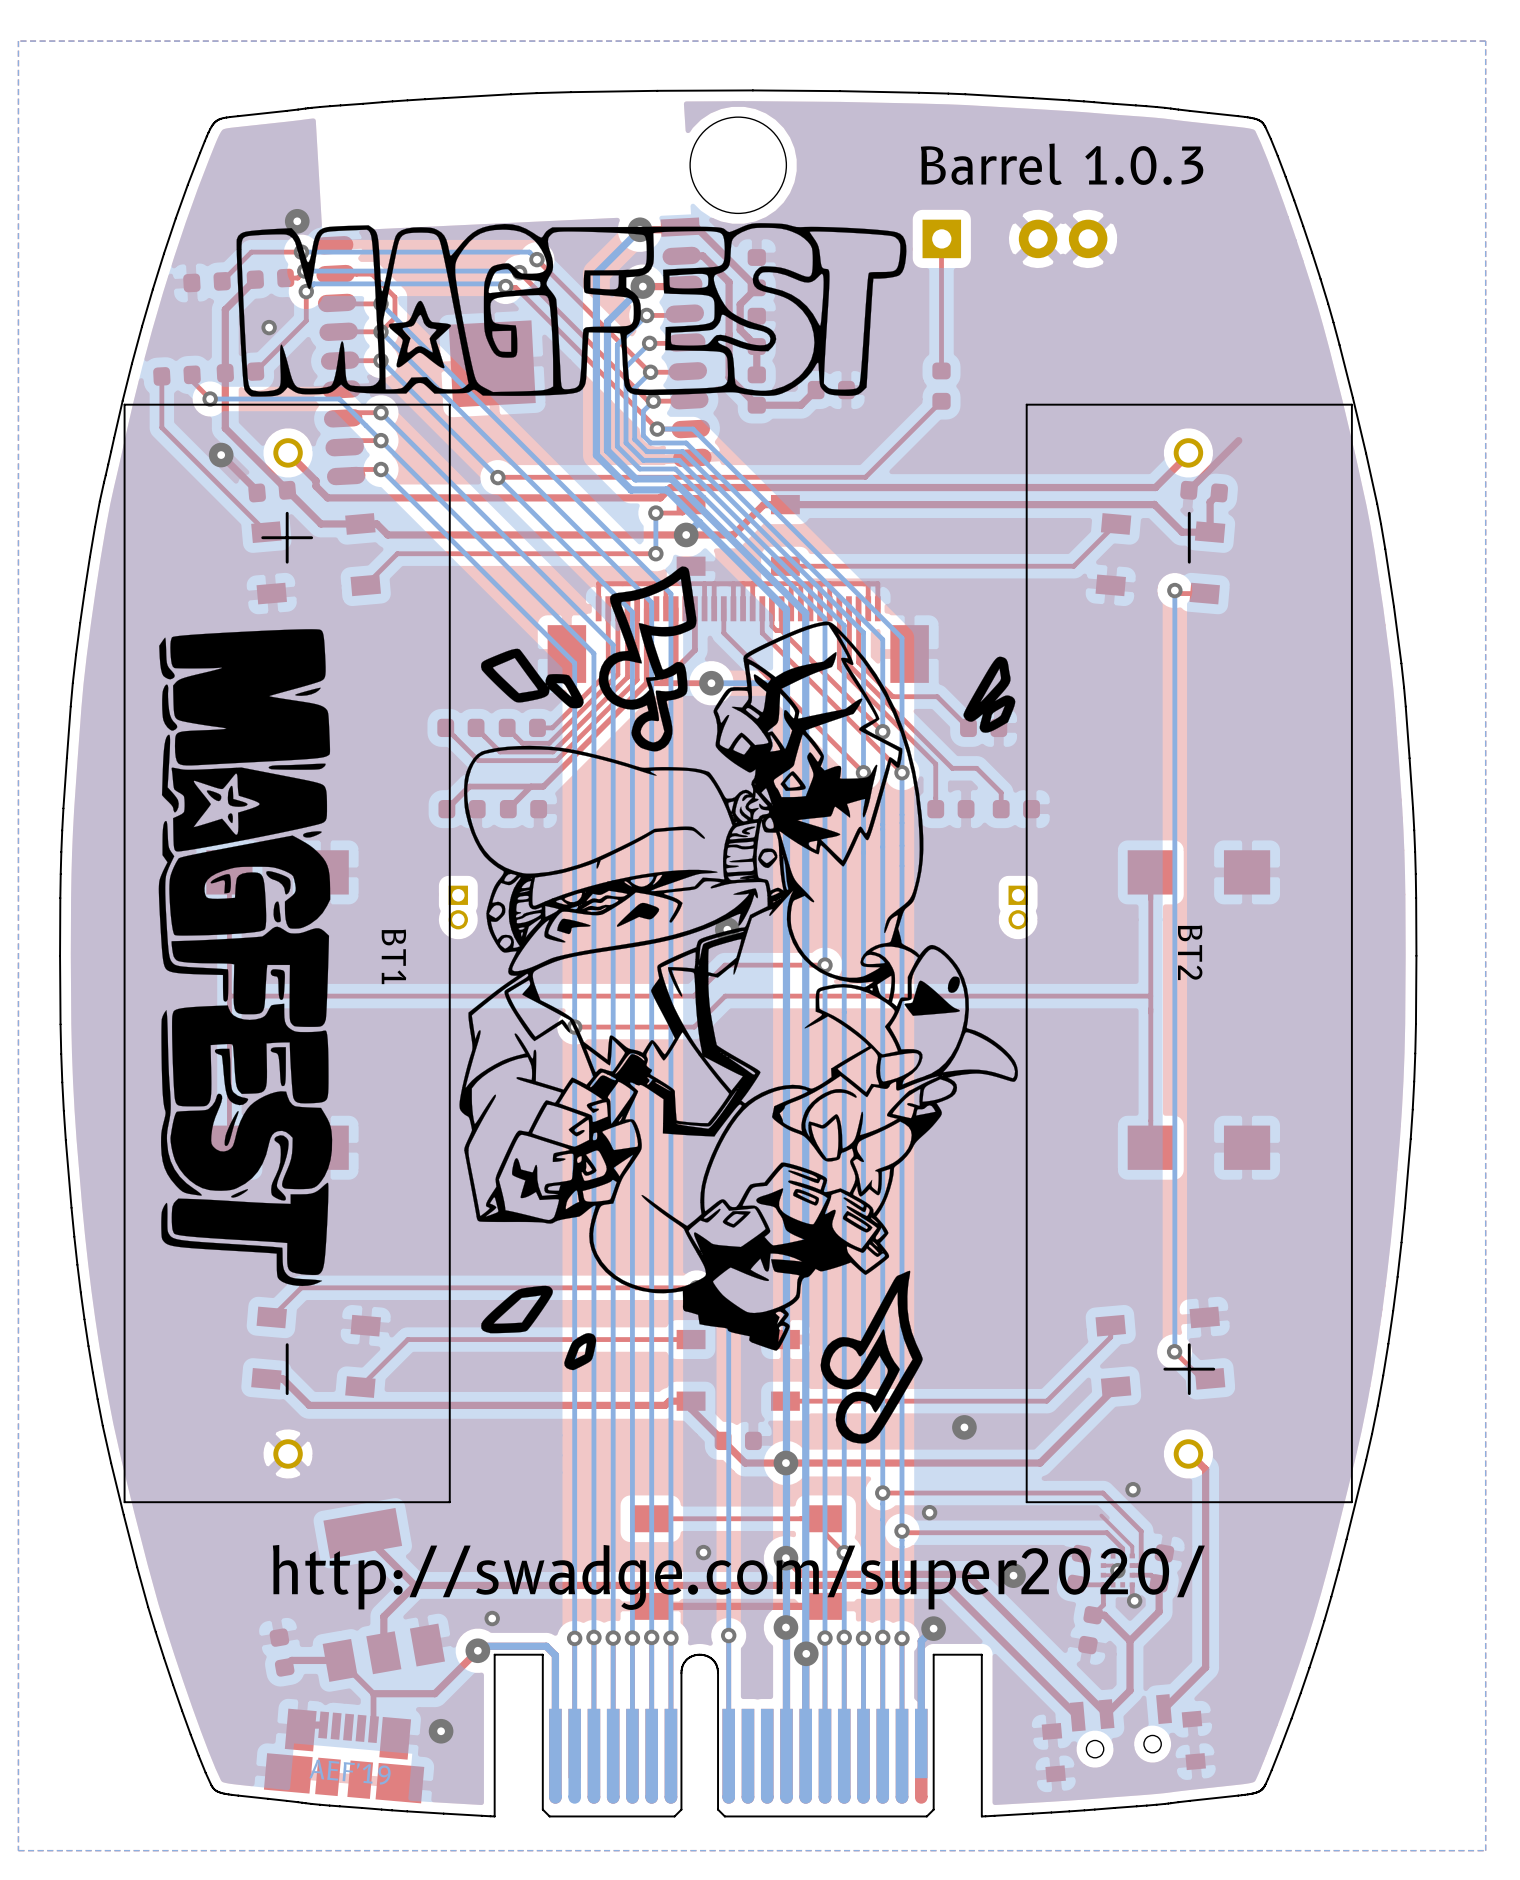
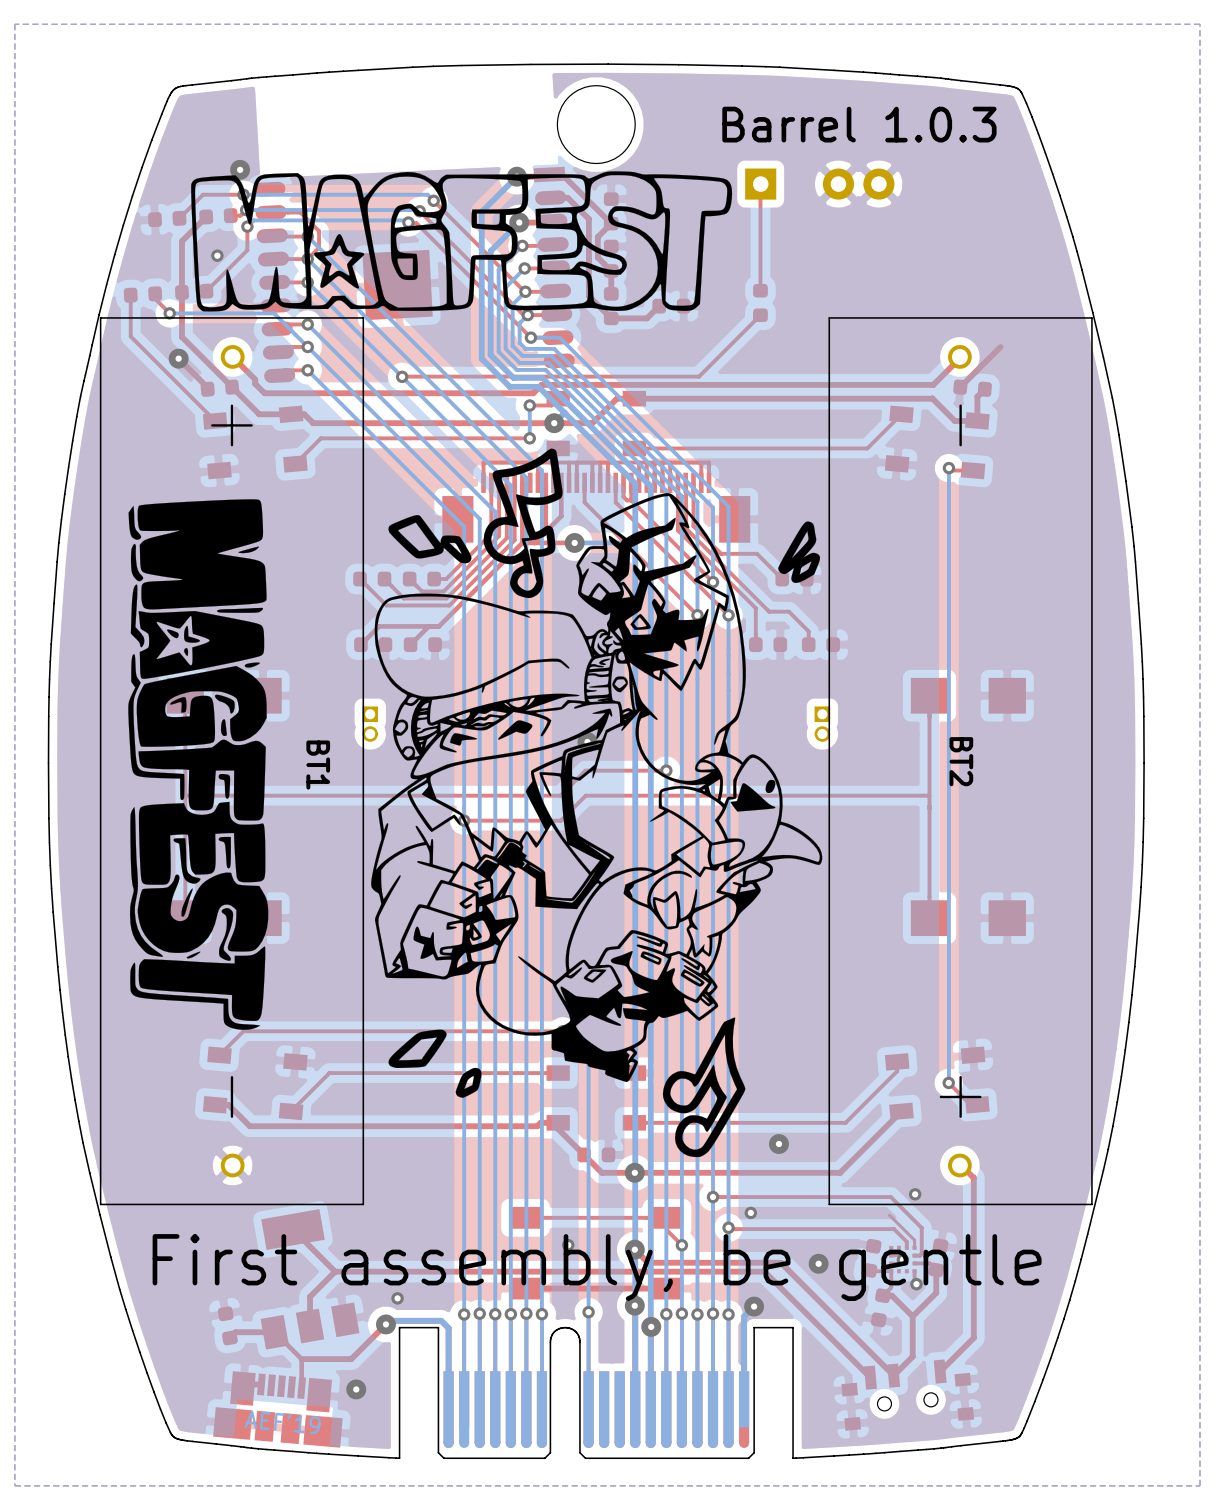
text: http://swadge.com/super2020/ (738, 1577) -> First assembly, be gentle (597, 1267)

